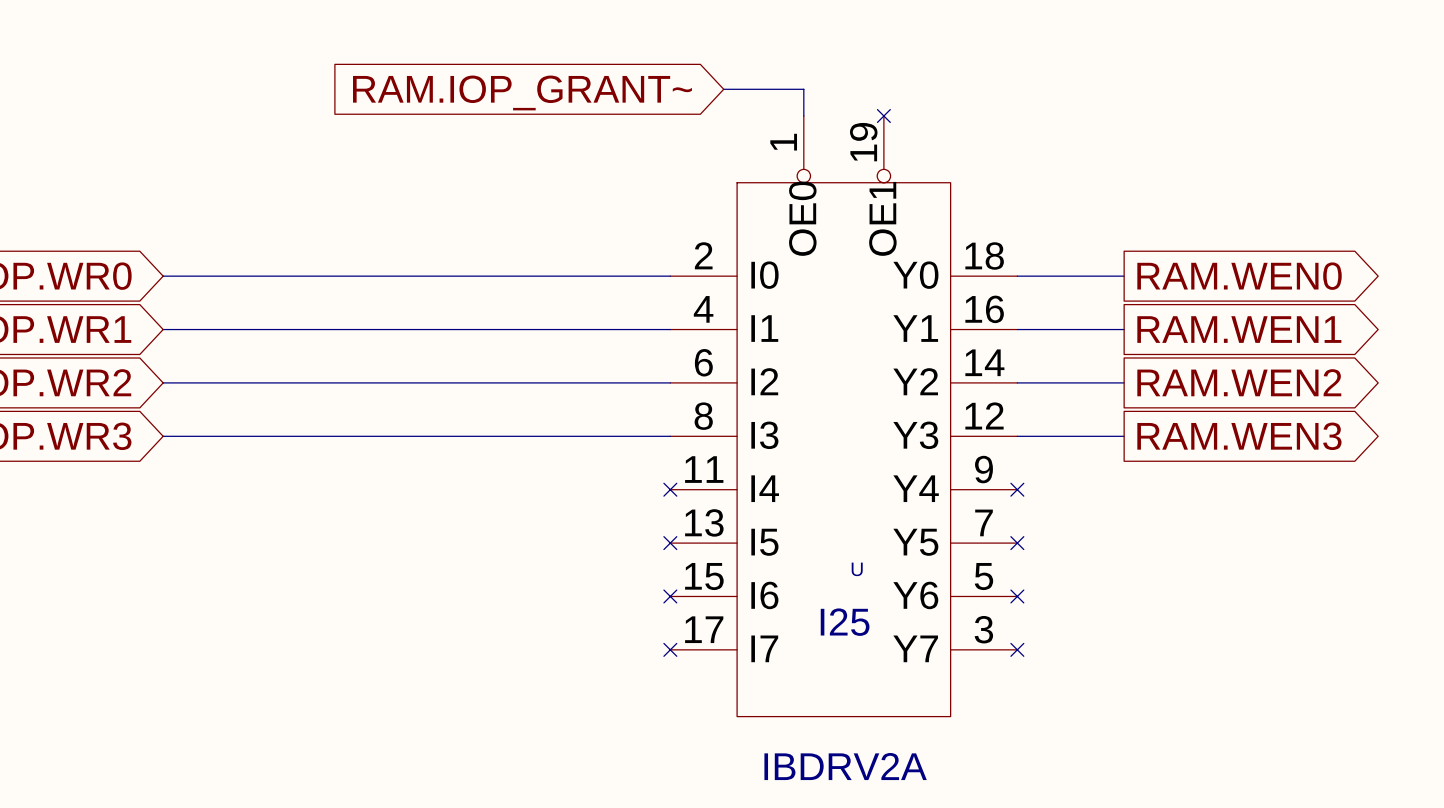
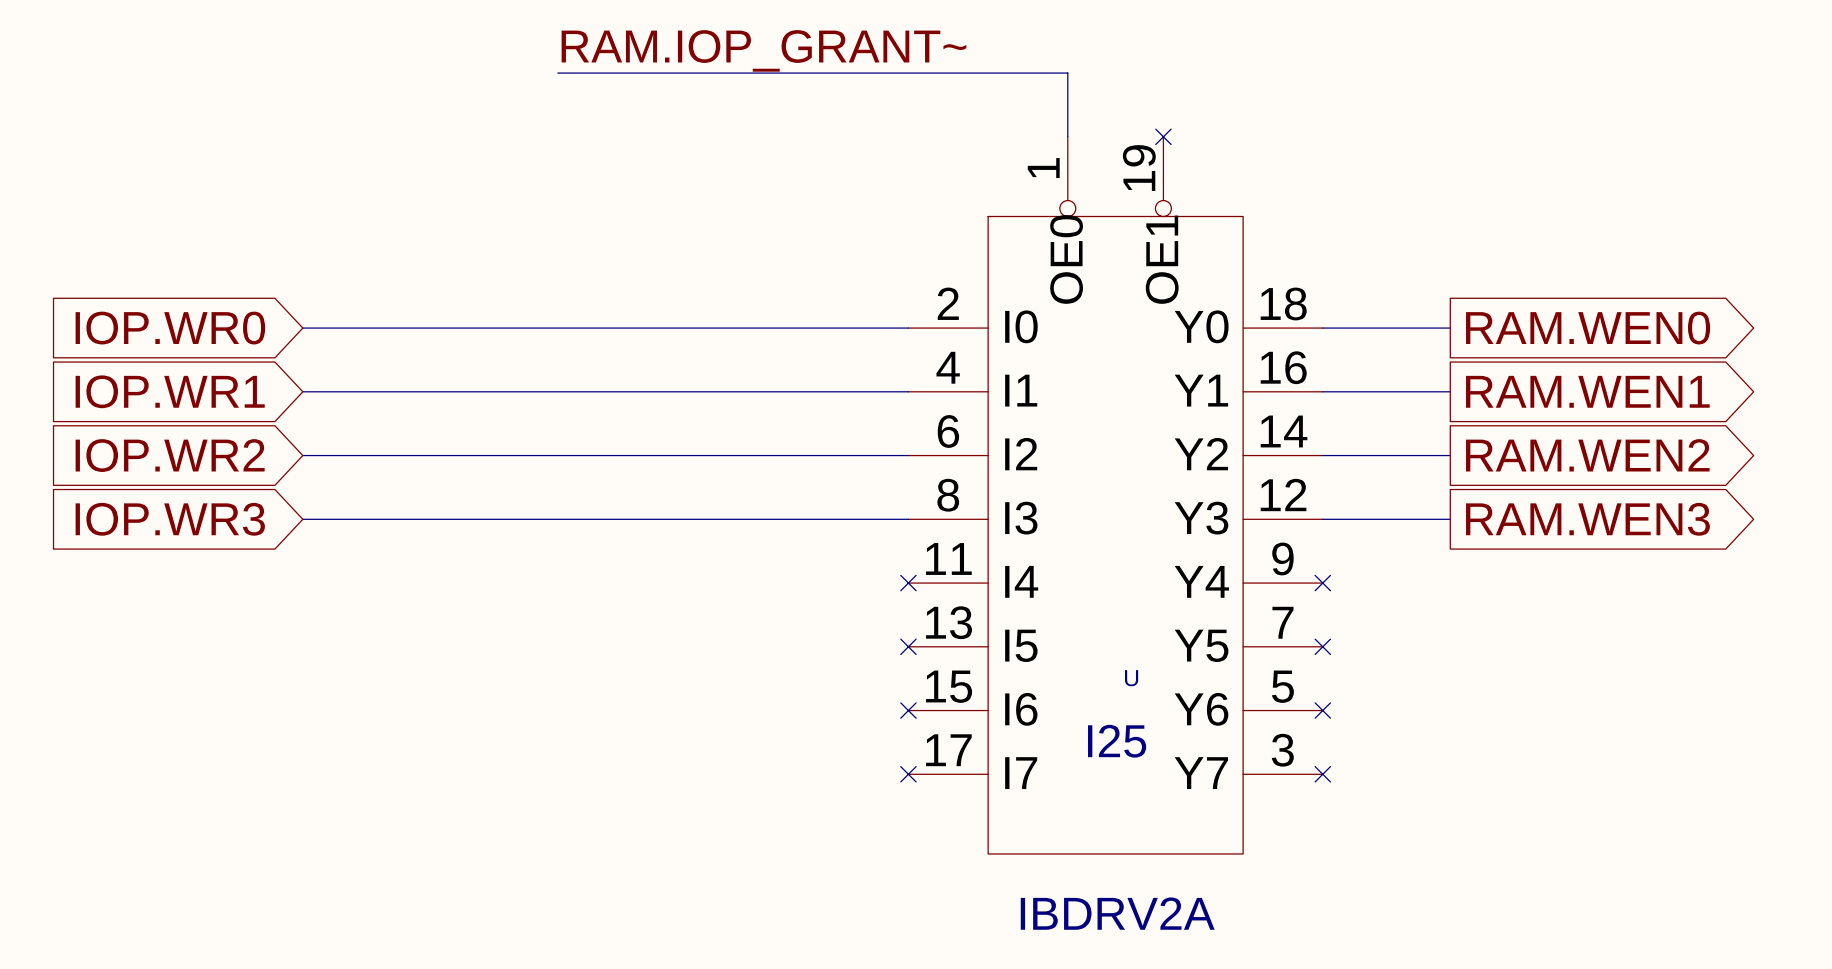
label: none -> RAM.IOP_GRANT~ (763, 50)
wire: (723, 89) (803, 89) -> (557, 73) (1067, 73) (1067, 104)
global label: RAM.IOP_GRANT~ (522, 92) -> none

